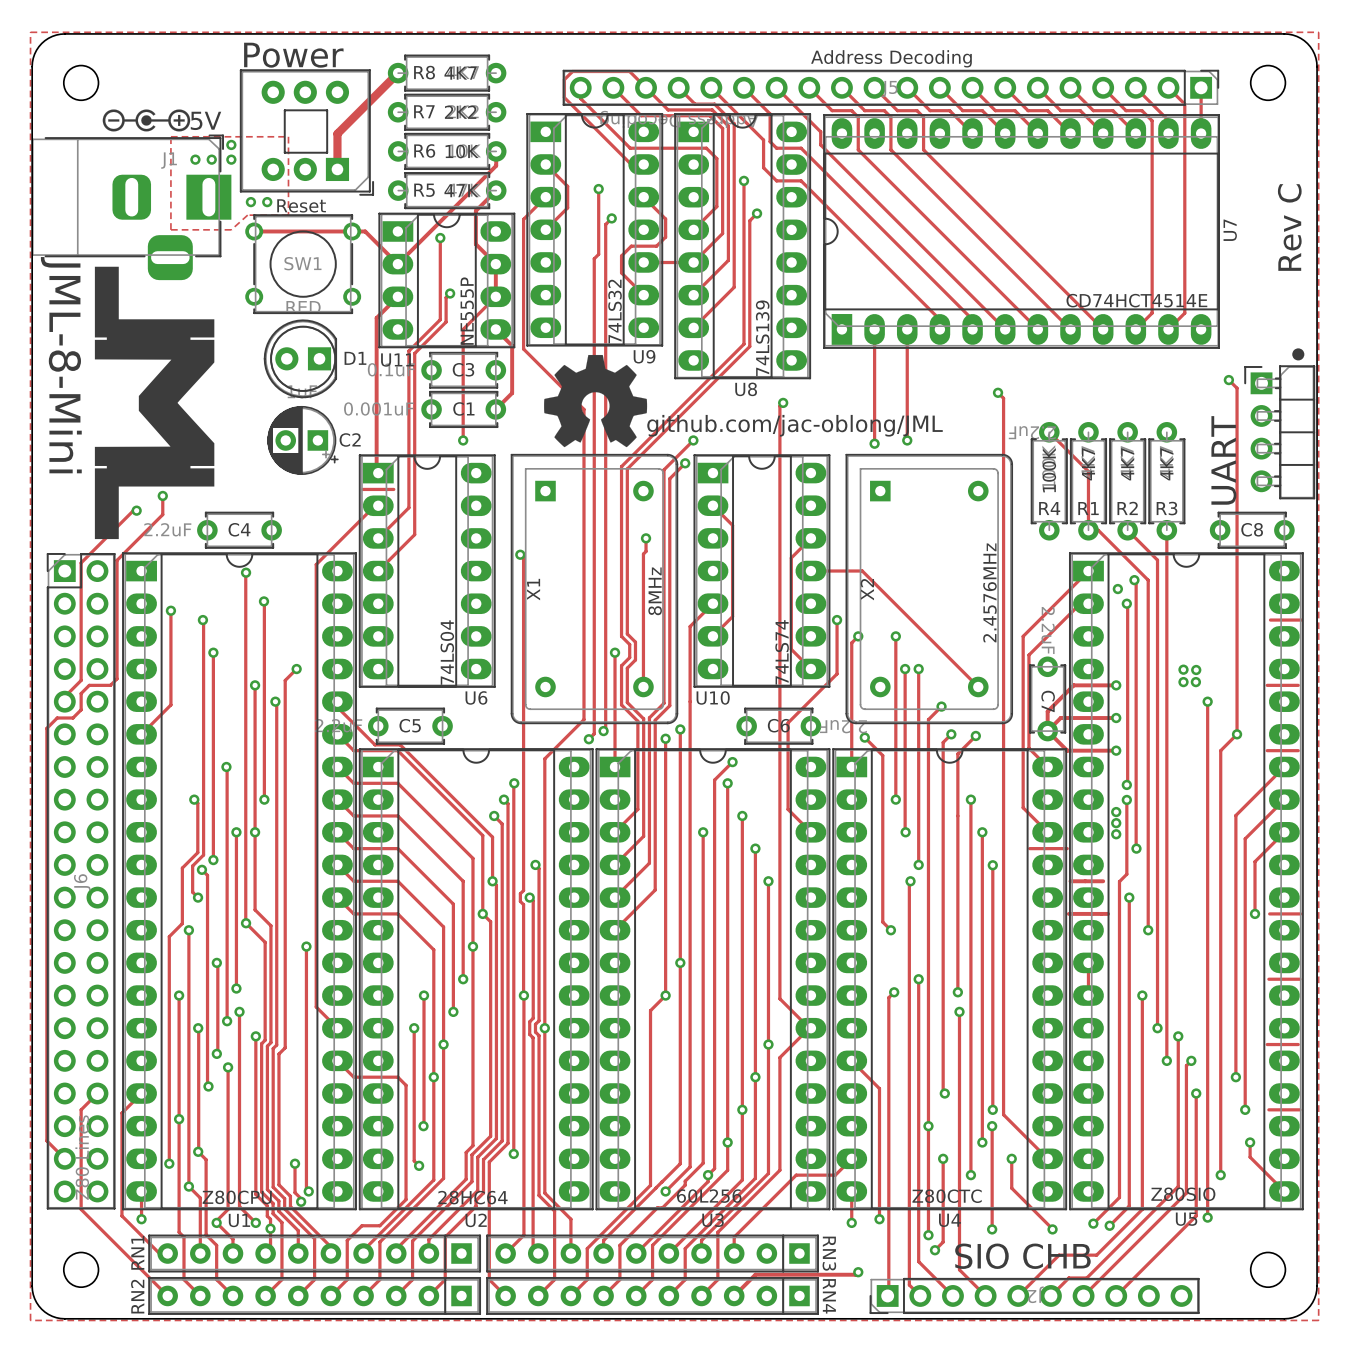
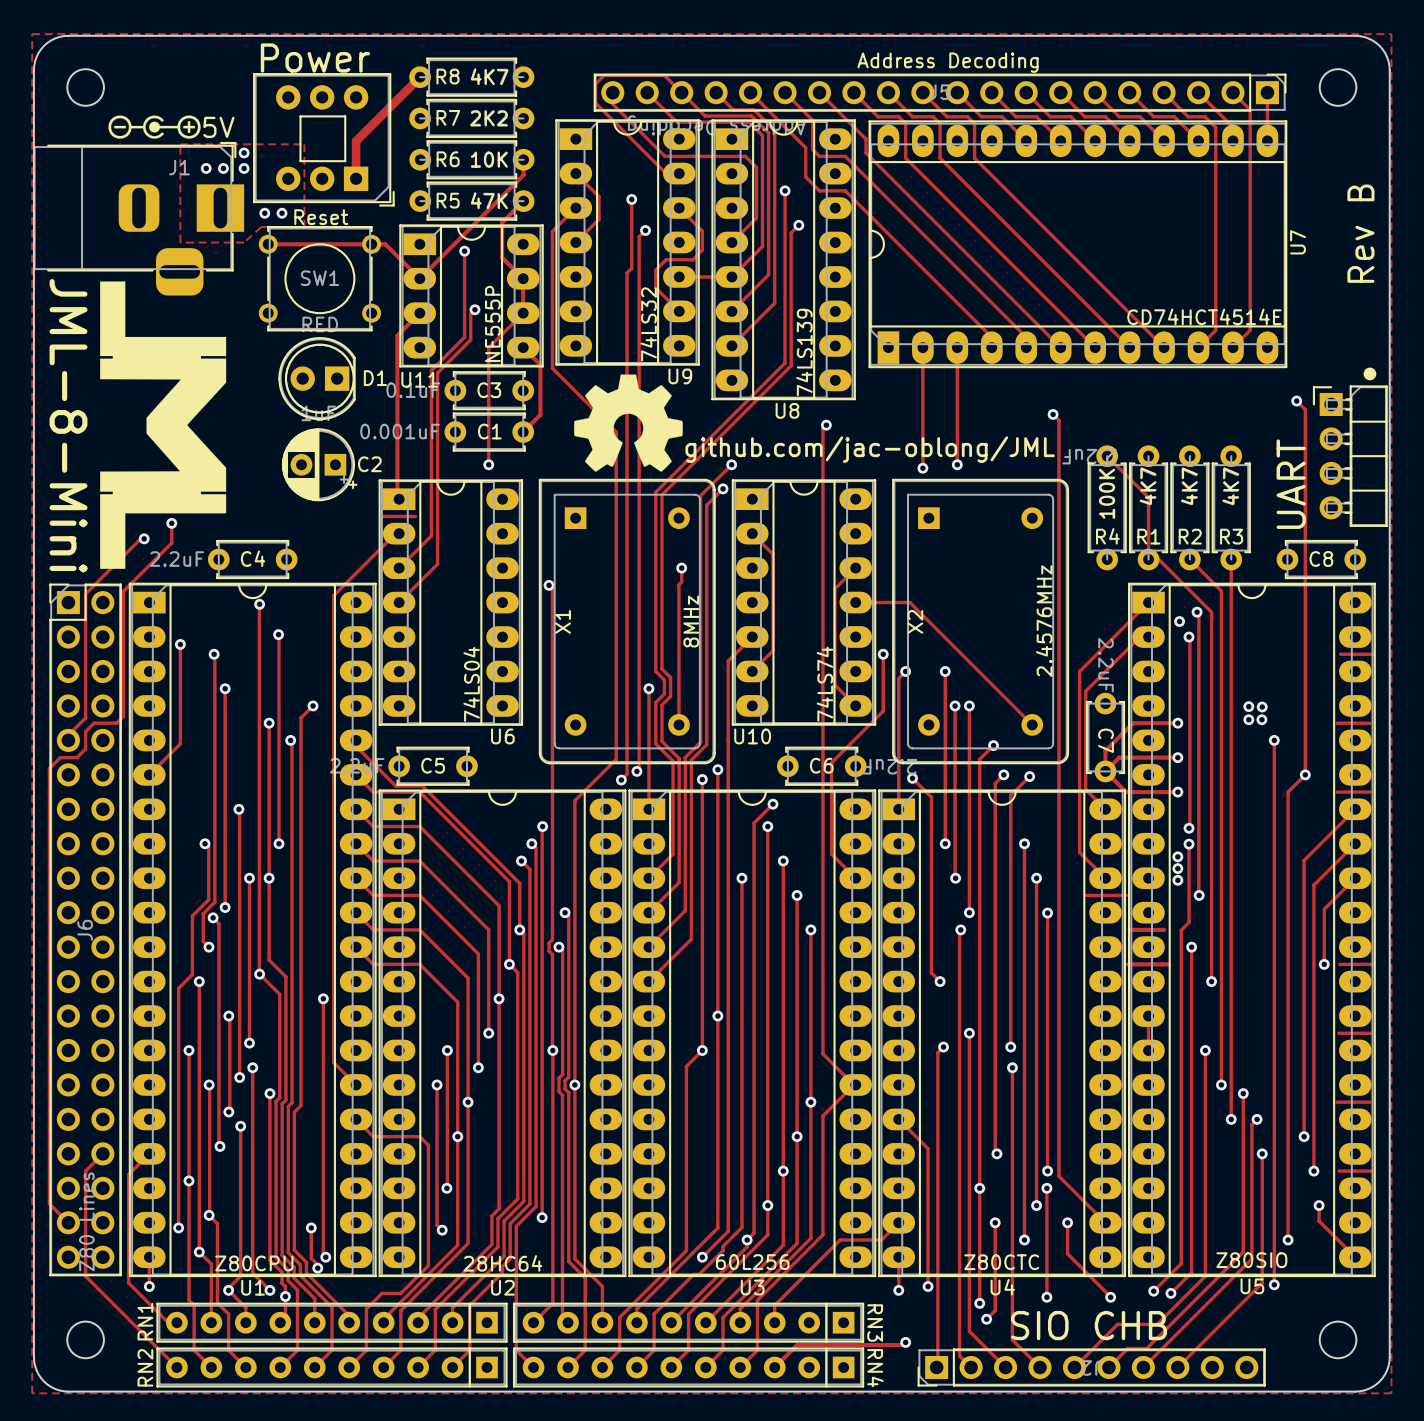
text: Rev C (1289, 227) -> Rev B (1360, 233)

